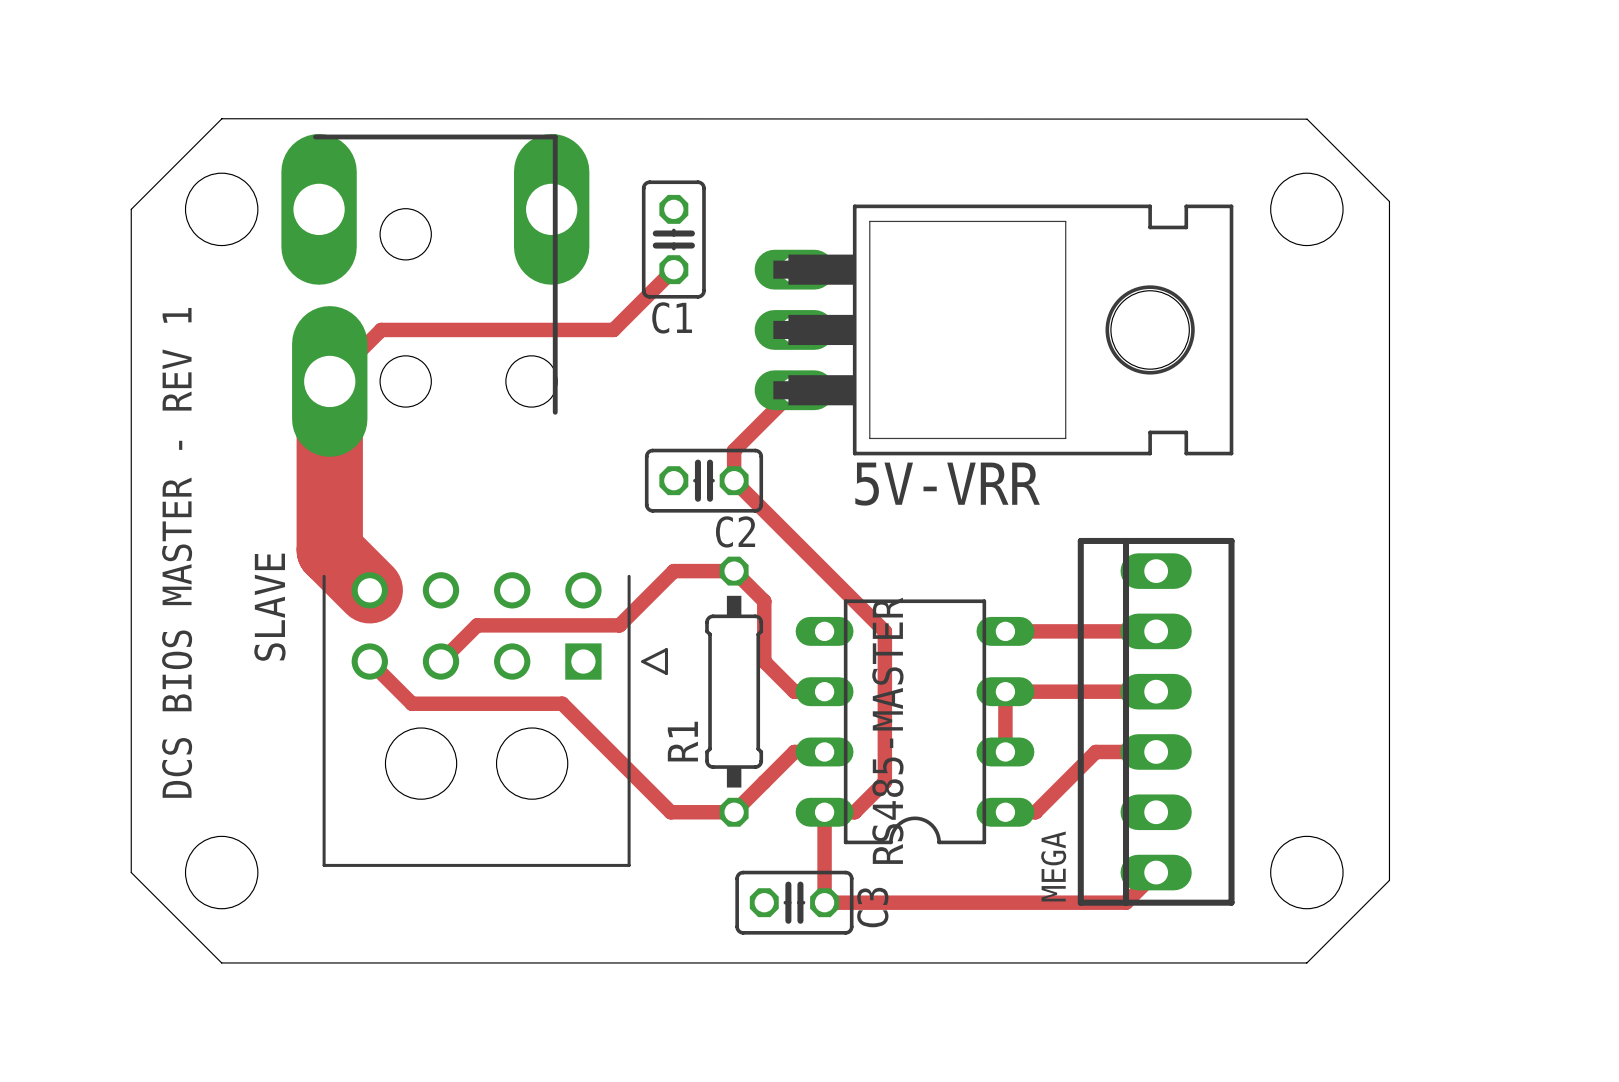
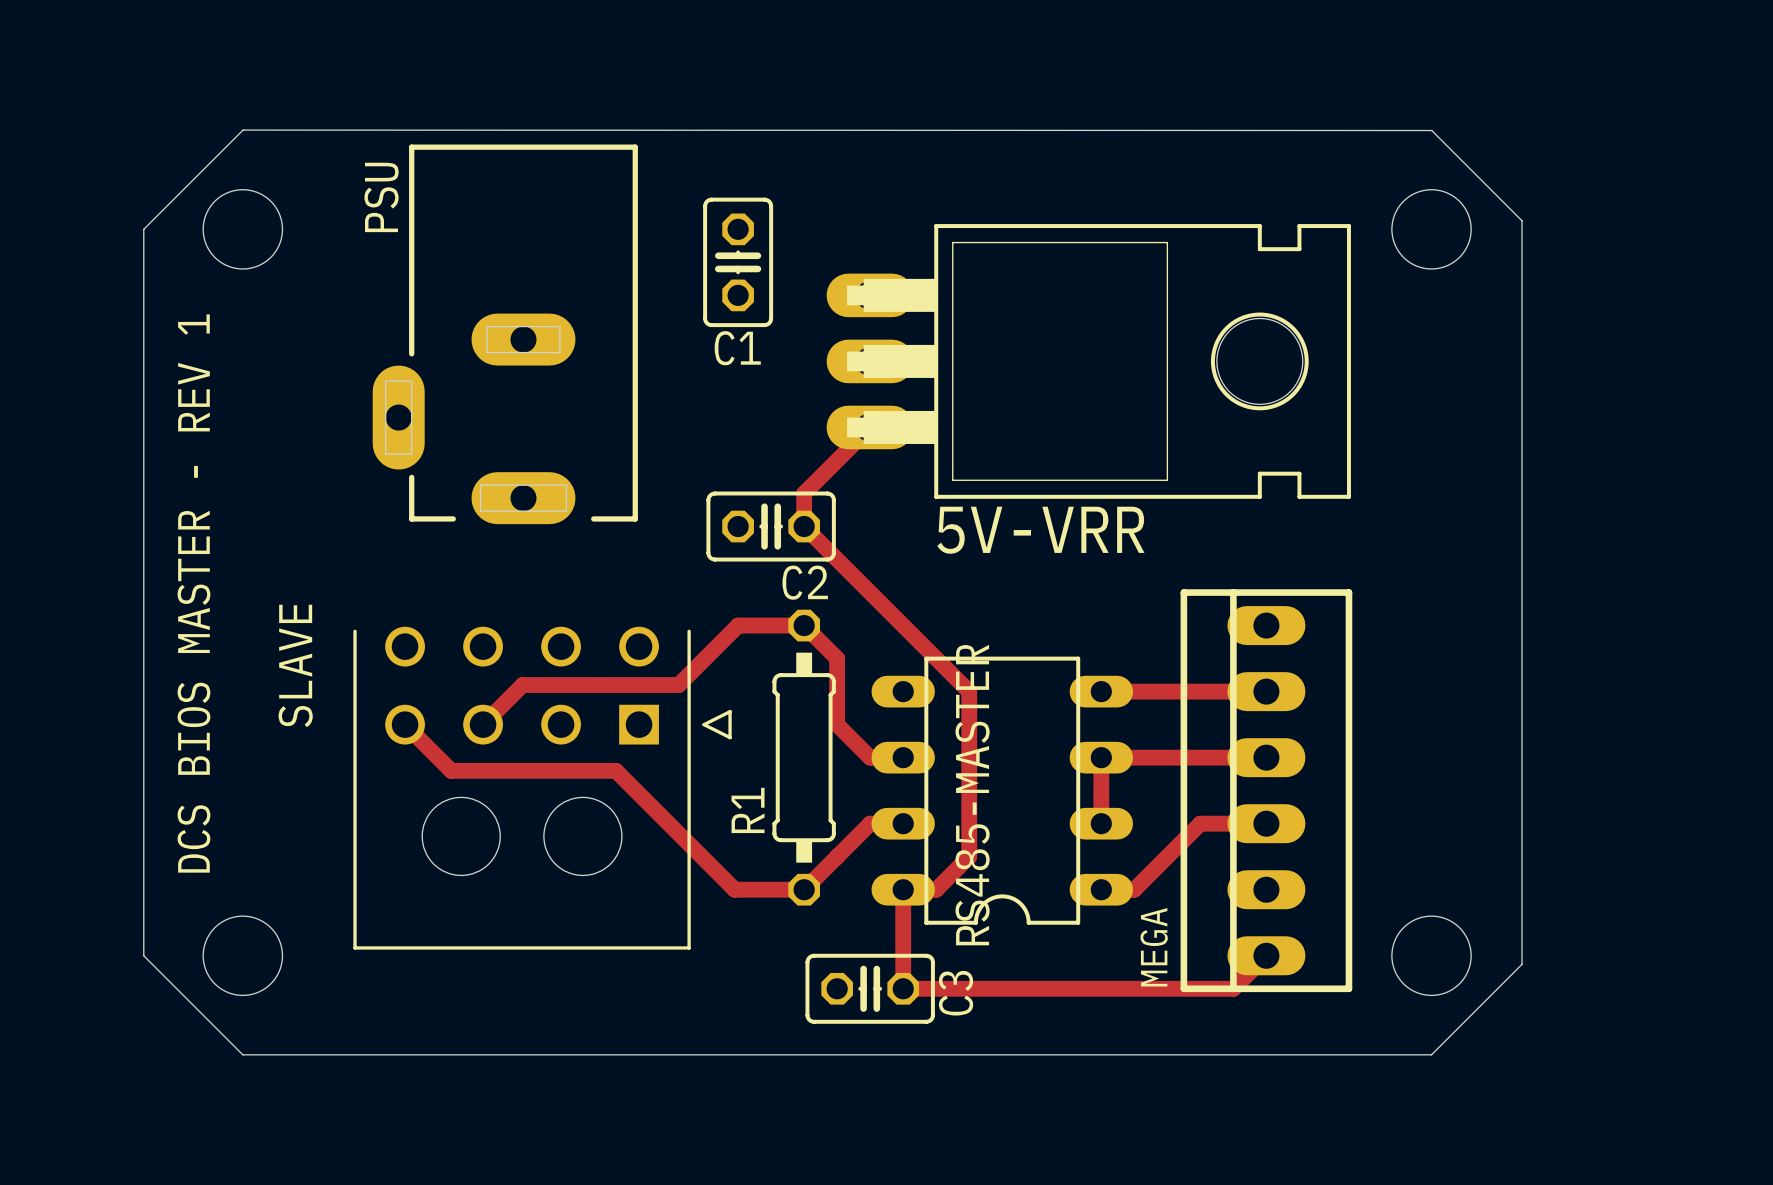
track: (673, 269) (613, 329) (381, 329) (329, 381) (329, 550) (369, 590) -> none
part: (435, 295) -> none
PSU: none -> (505, 334)

